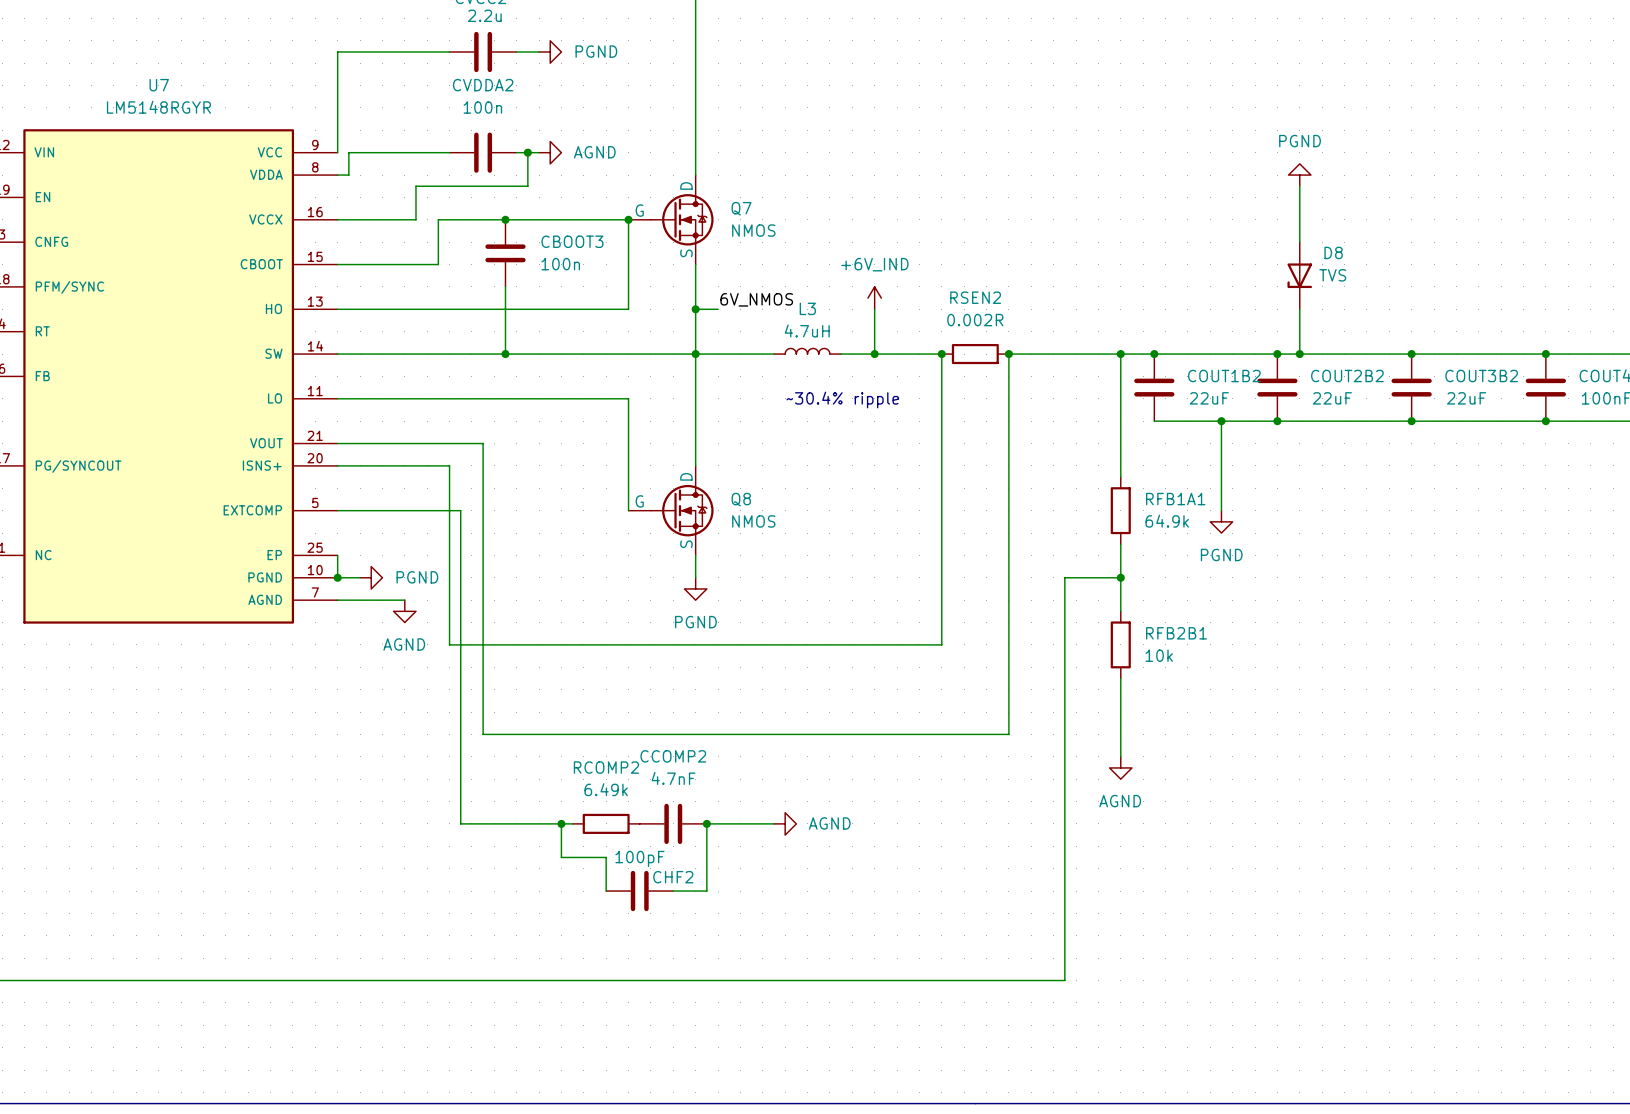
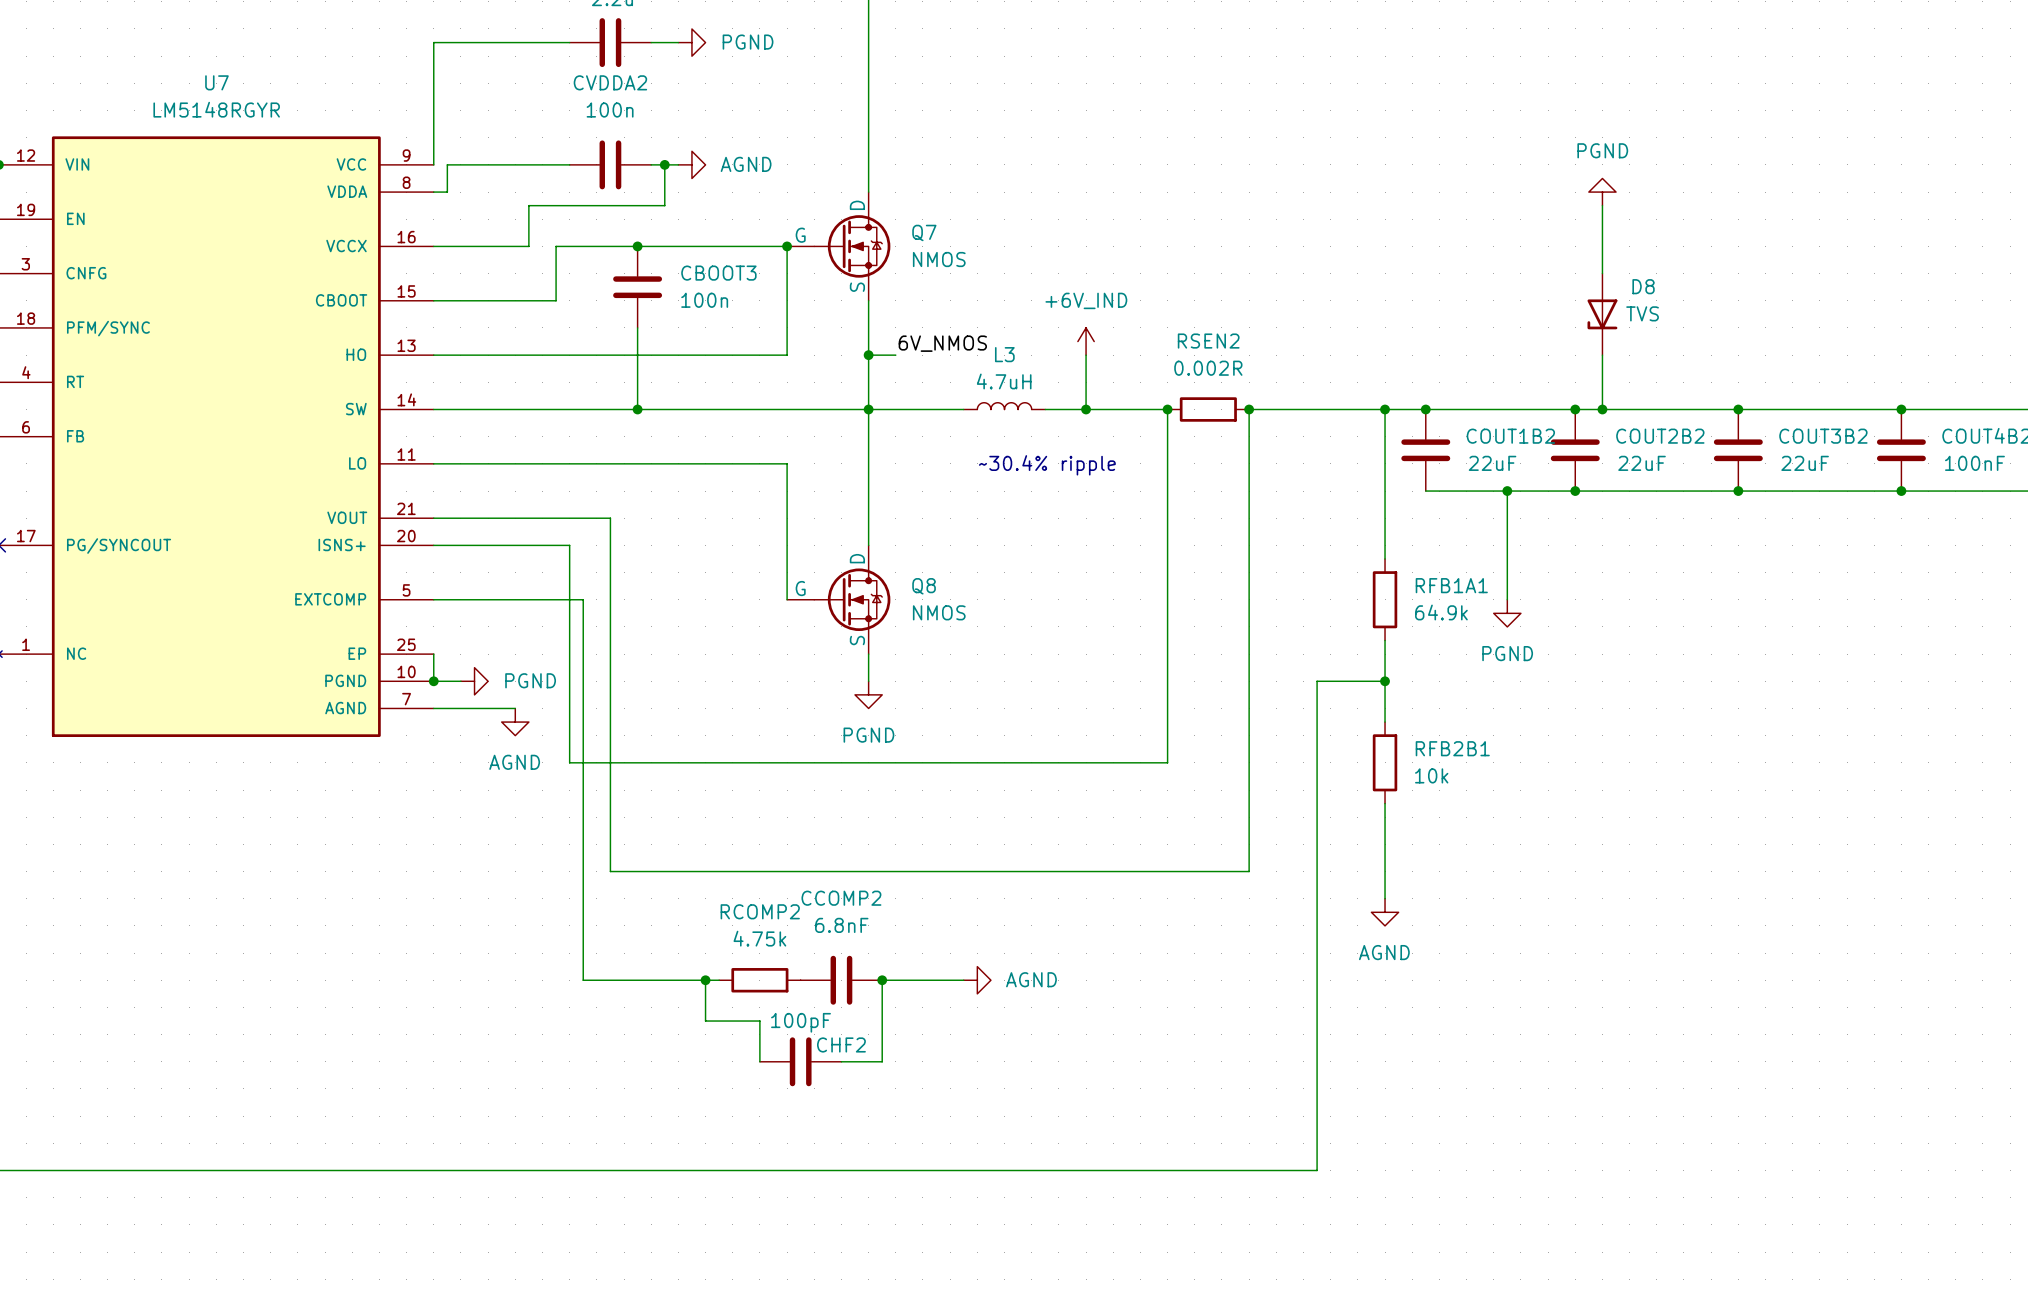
CCOMP2 value: 4.7nF (673, 778) -> 6.8nF (841, 925)
RCOMP2 value: 6.49k (606, 789) -> 4.75k (759, 938)

